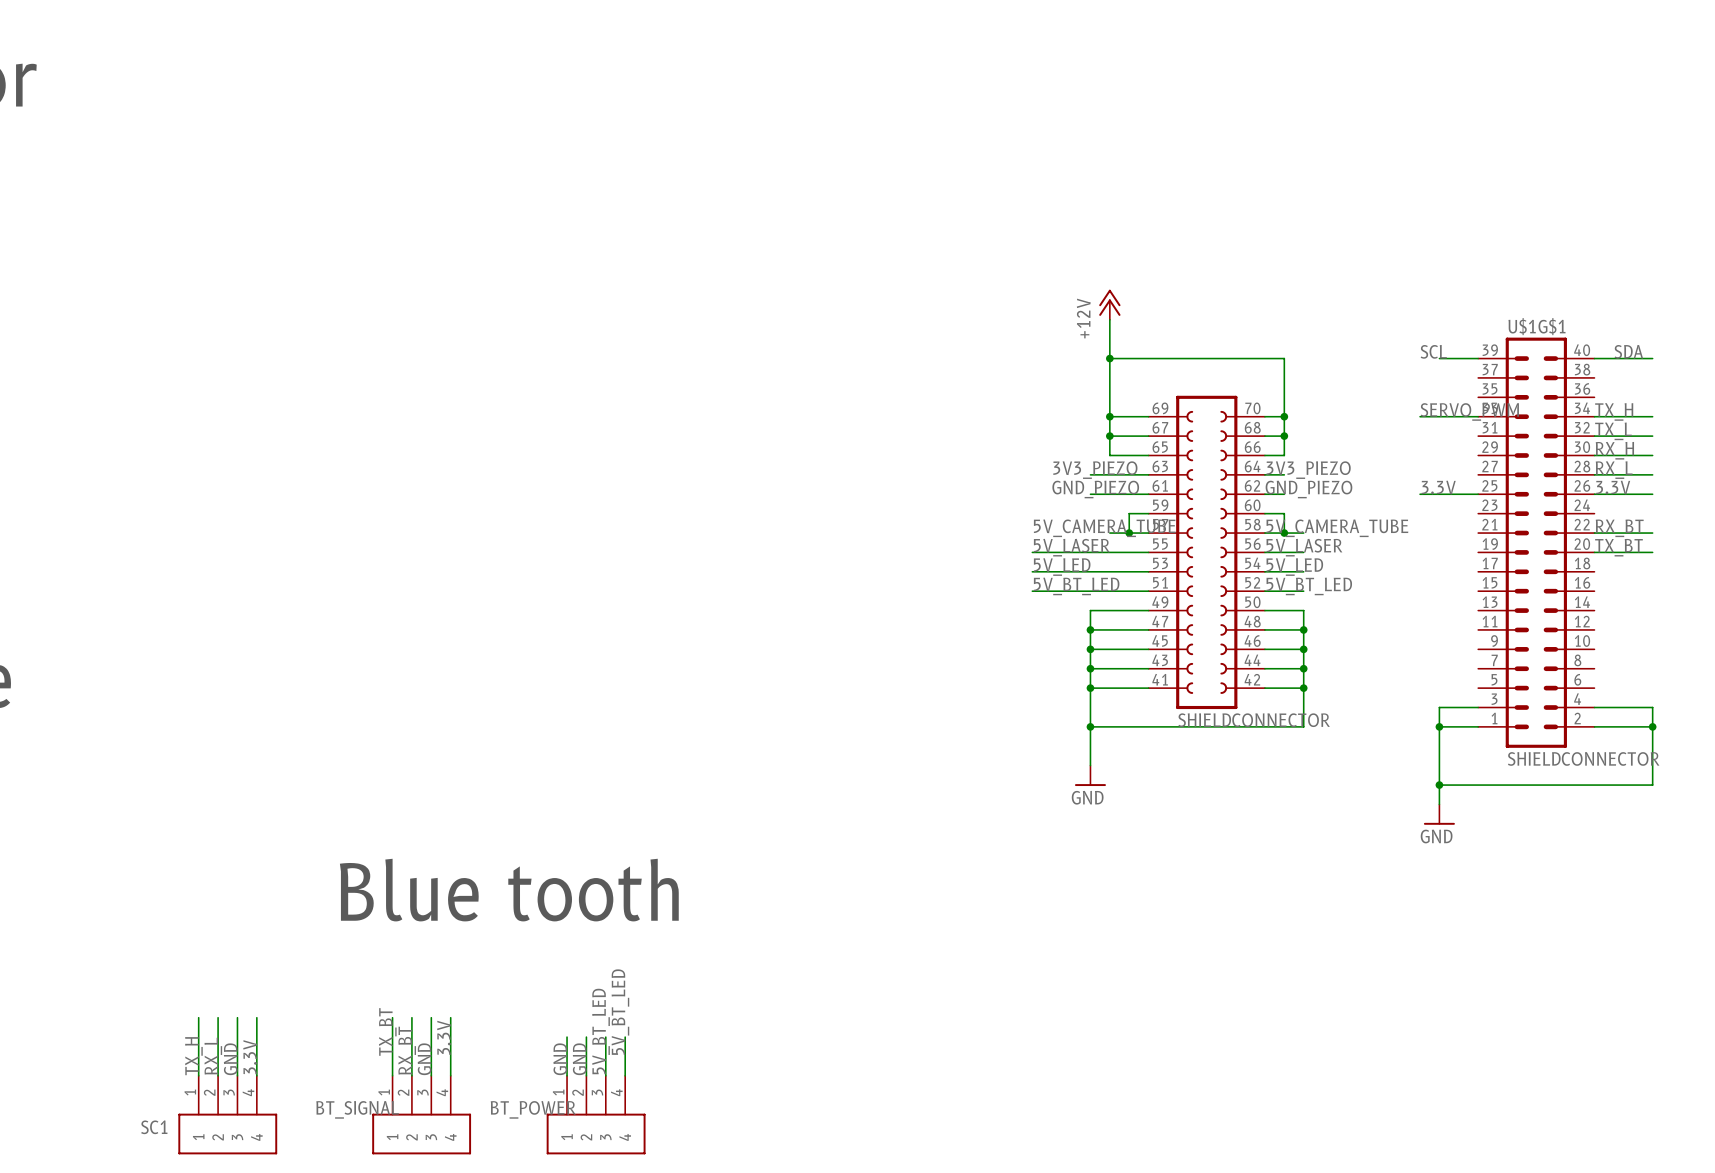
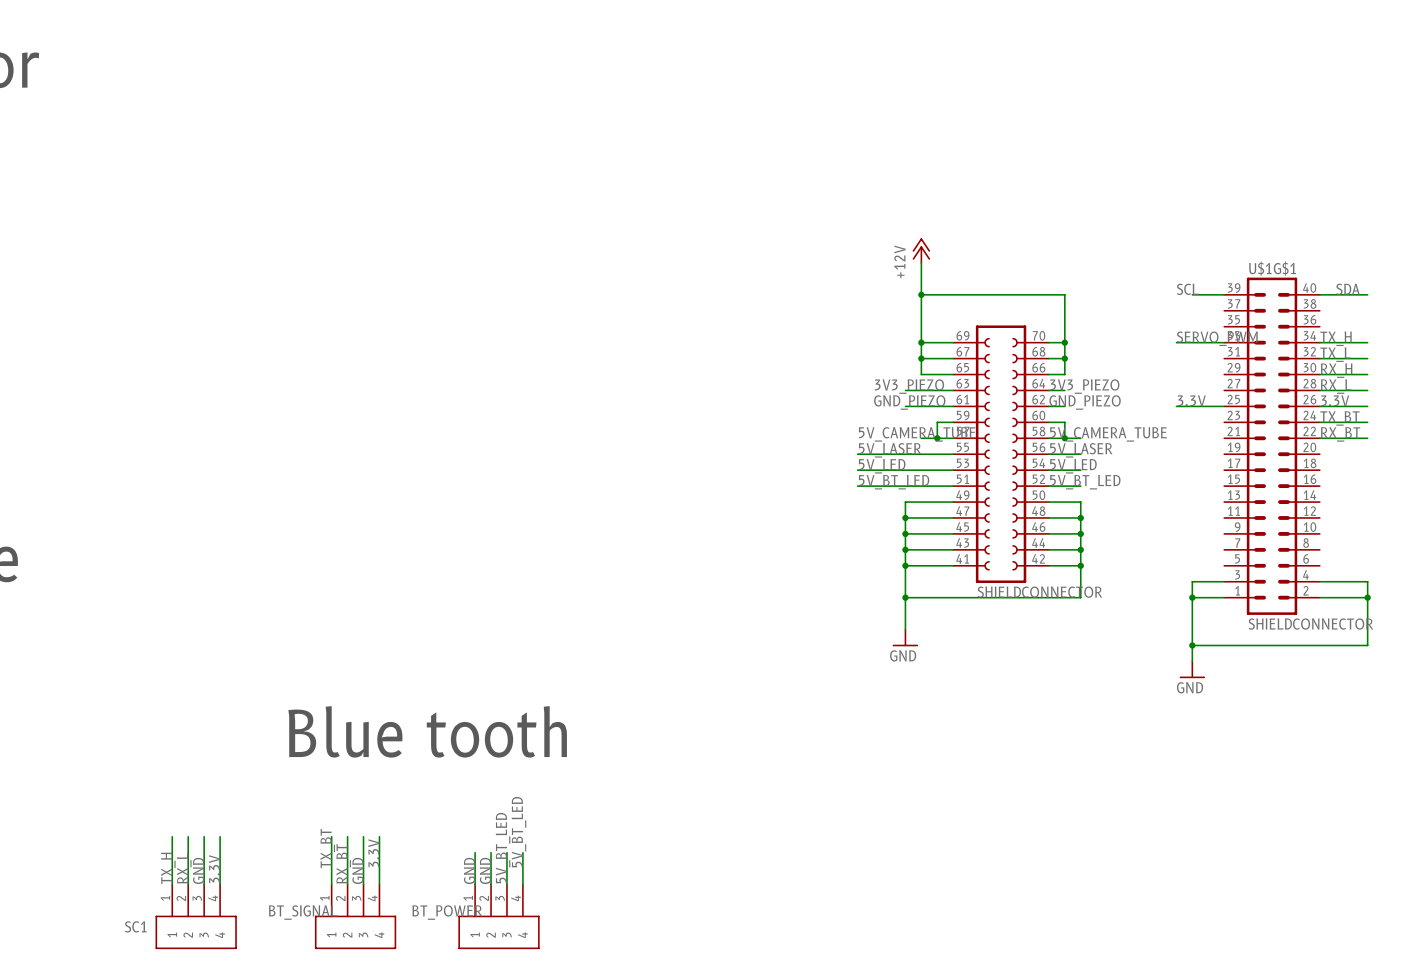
label position: TX_BT (1618, 547) -> TX_BT (1339, 418)
wire: (1594, 552) (1652, 552) -> (1319, 422) (1367, 422)

